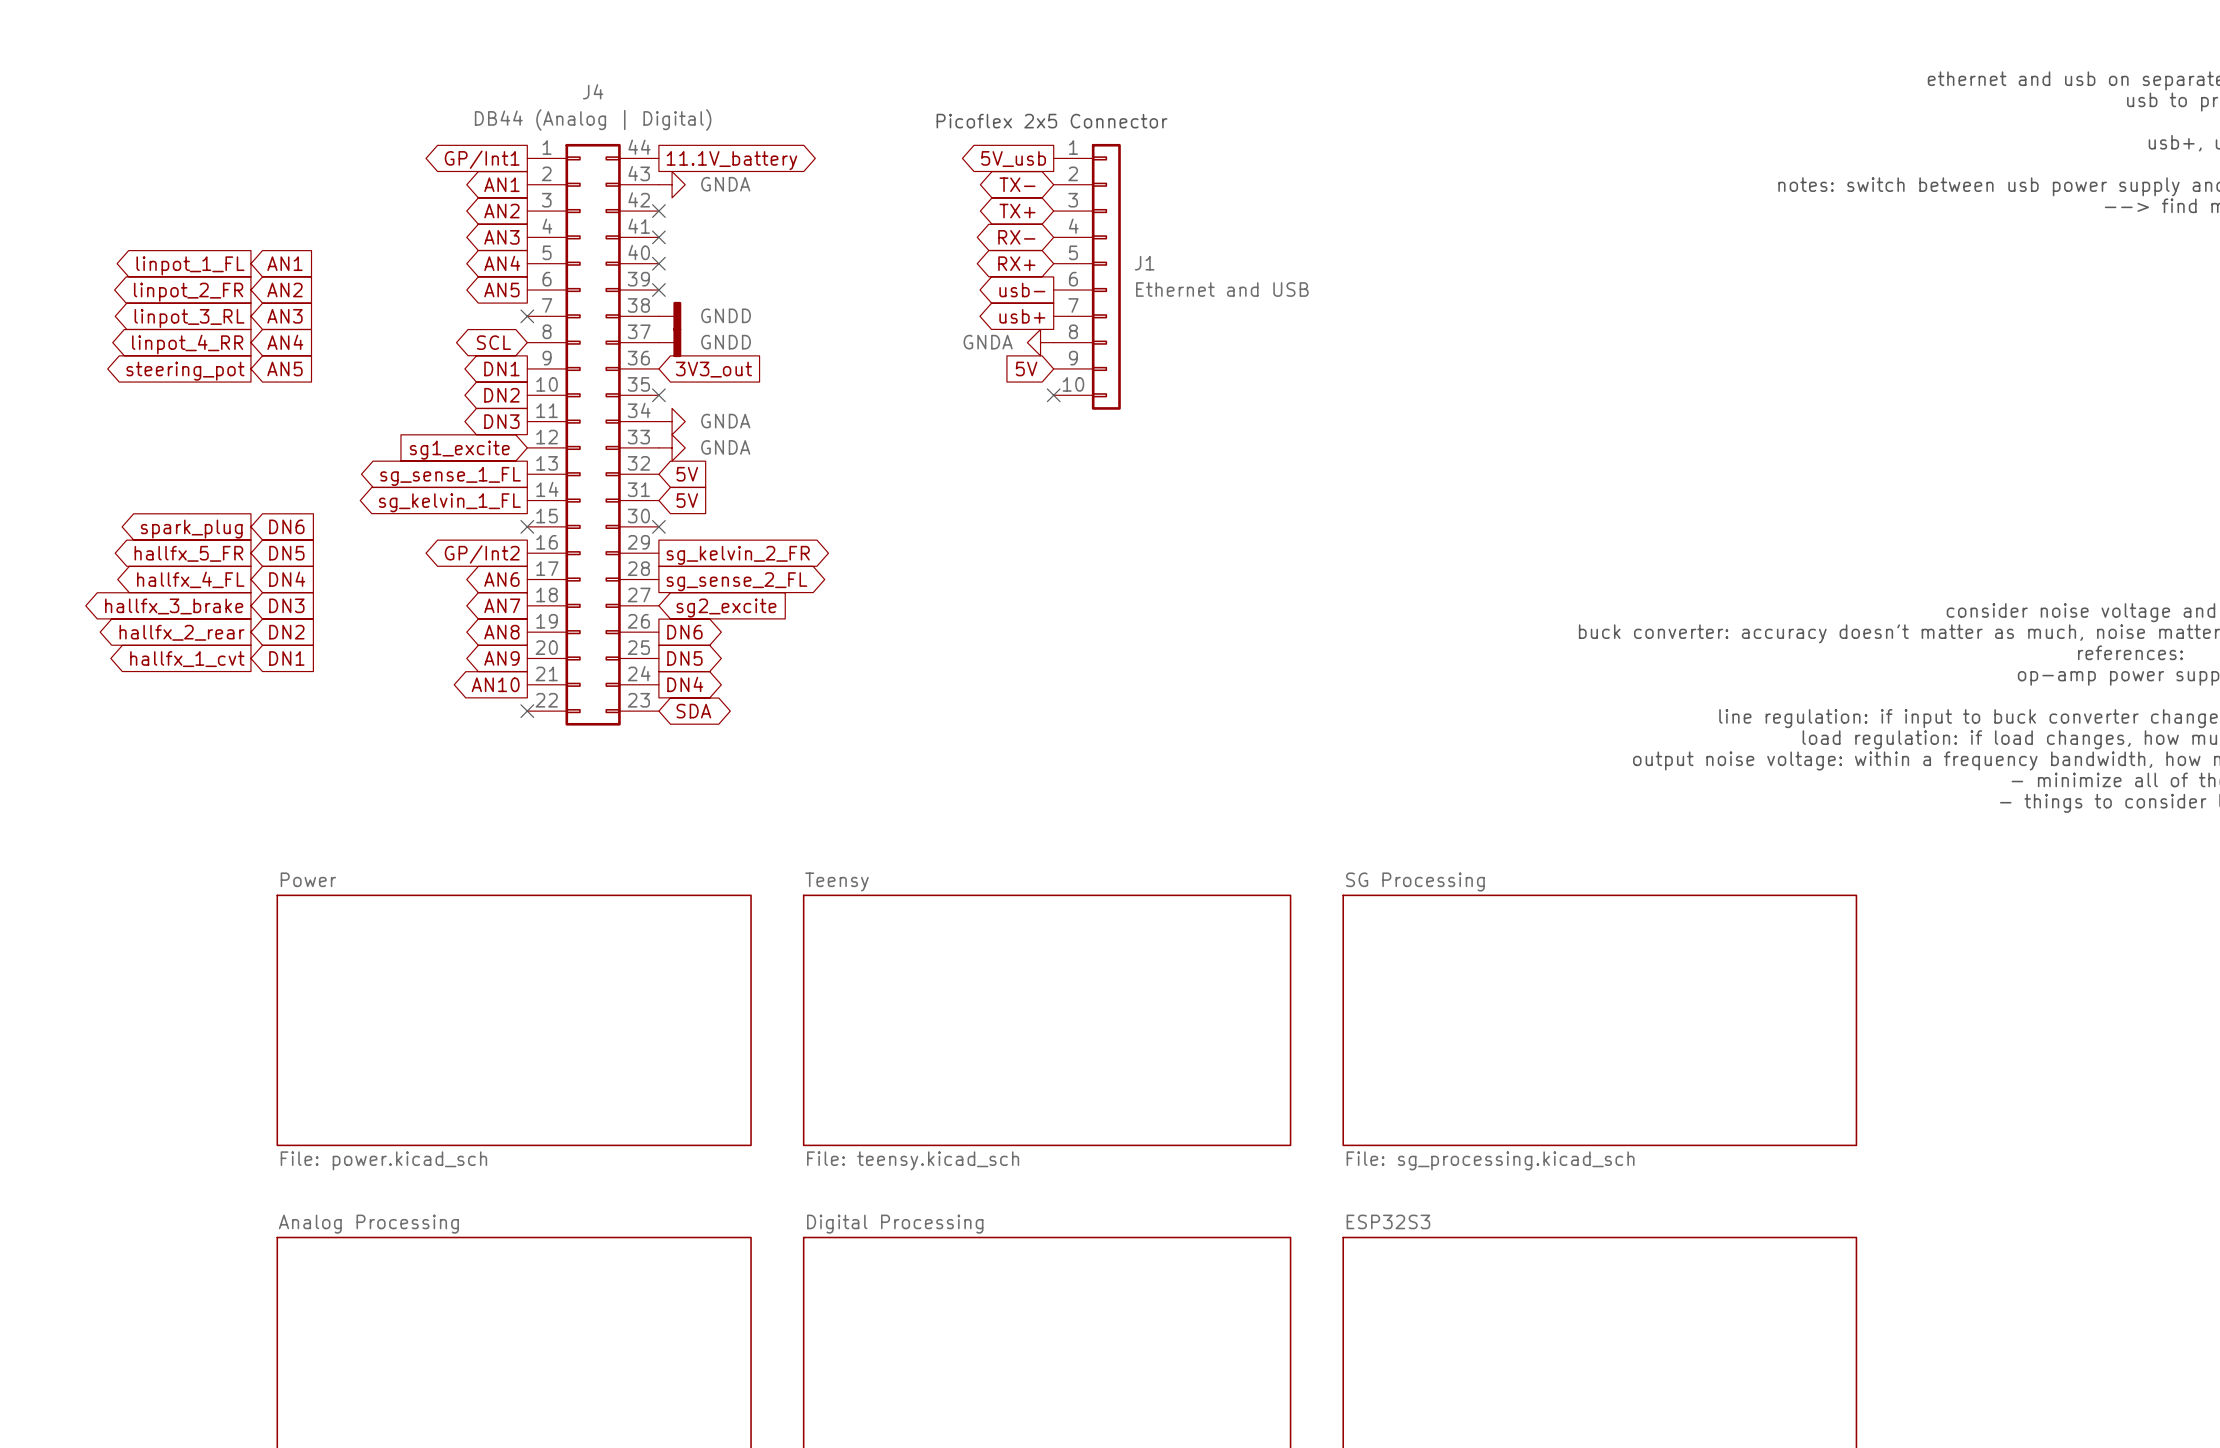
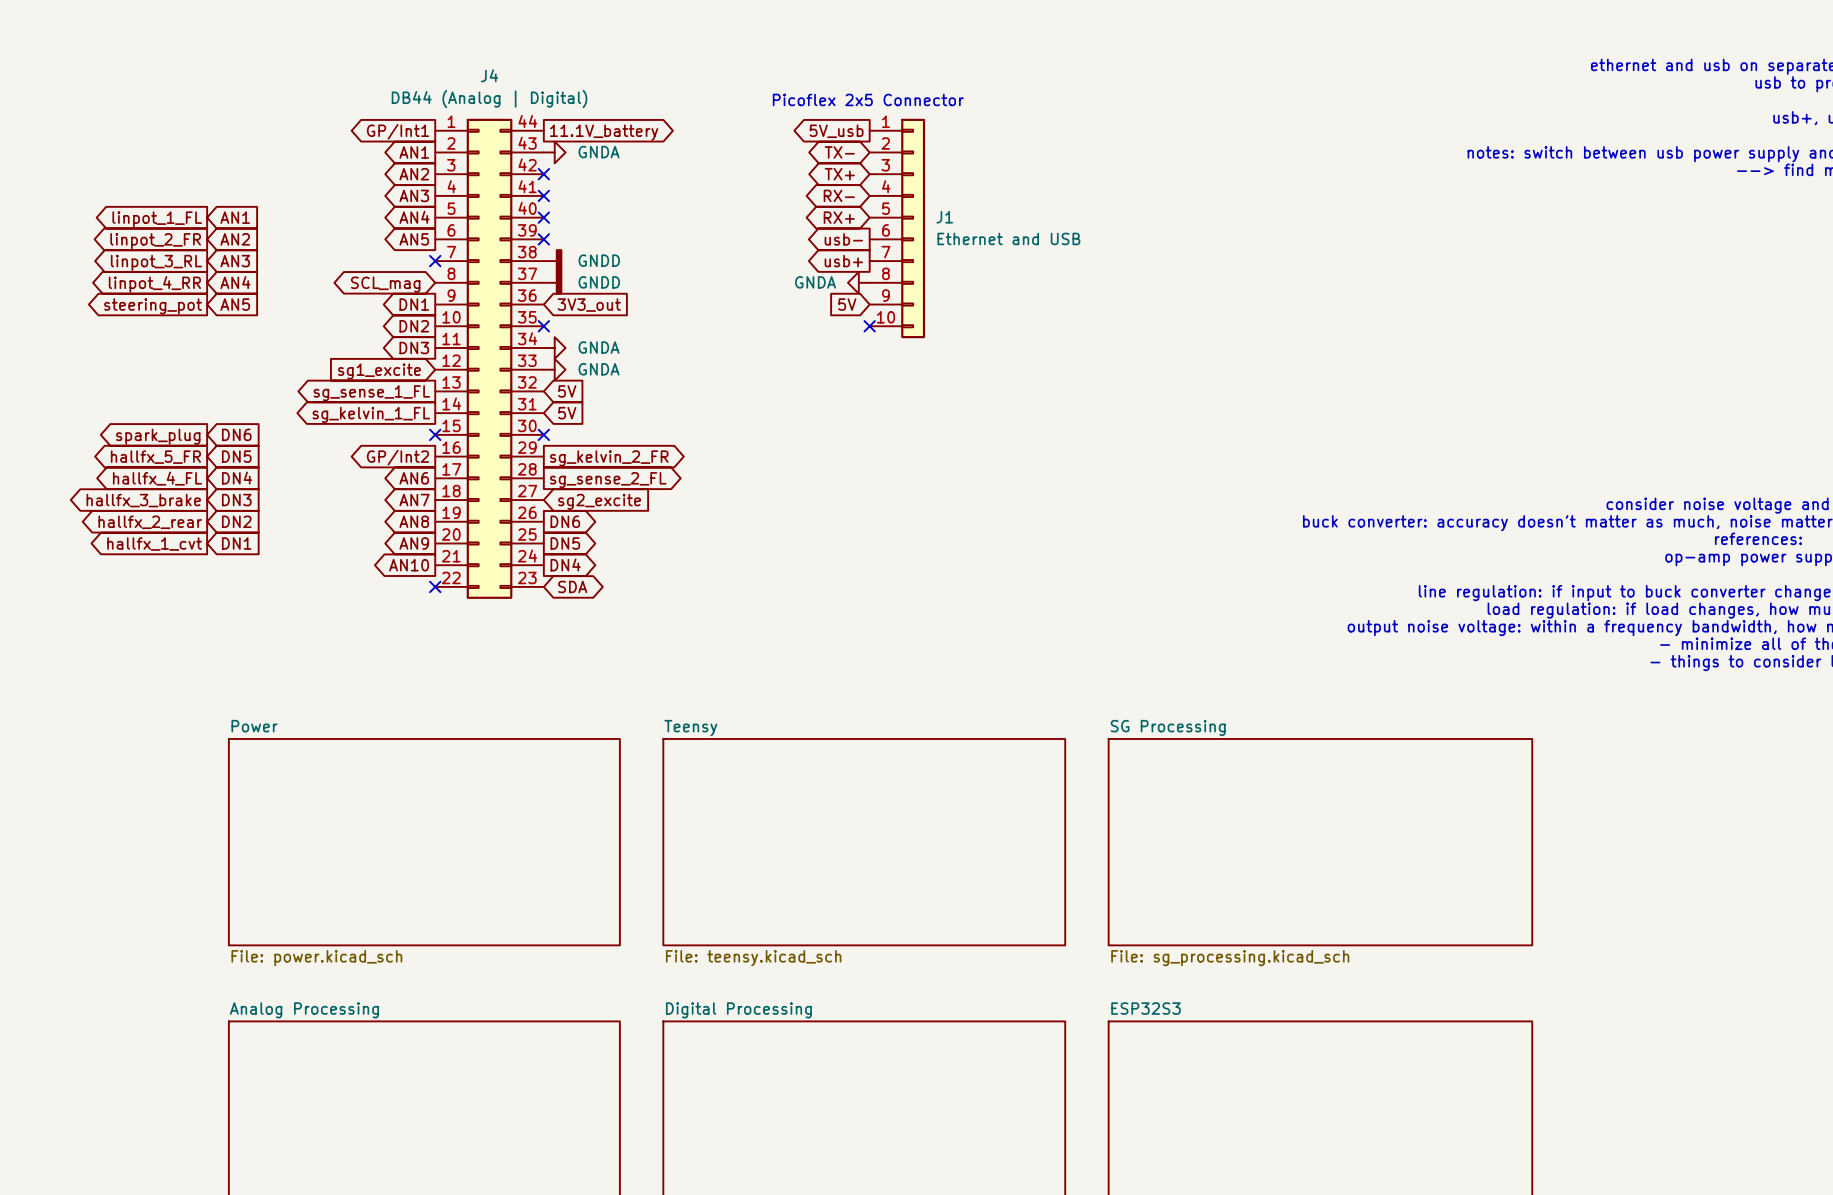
global label: SCL (493, 342) -> SCL_mag (385, 284)

